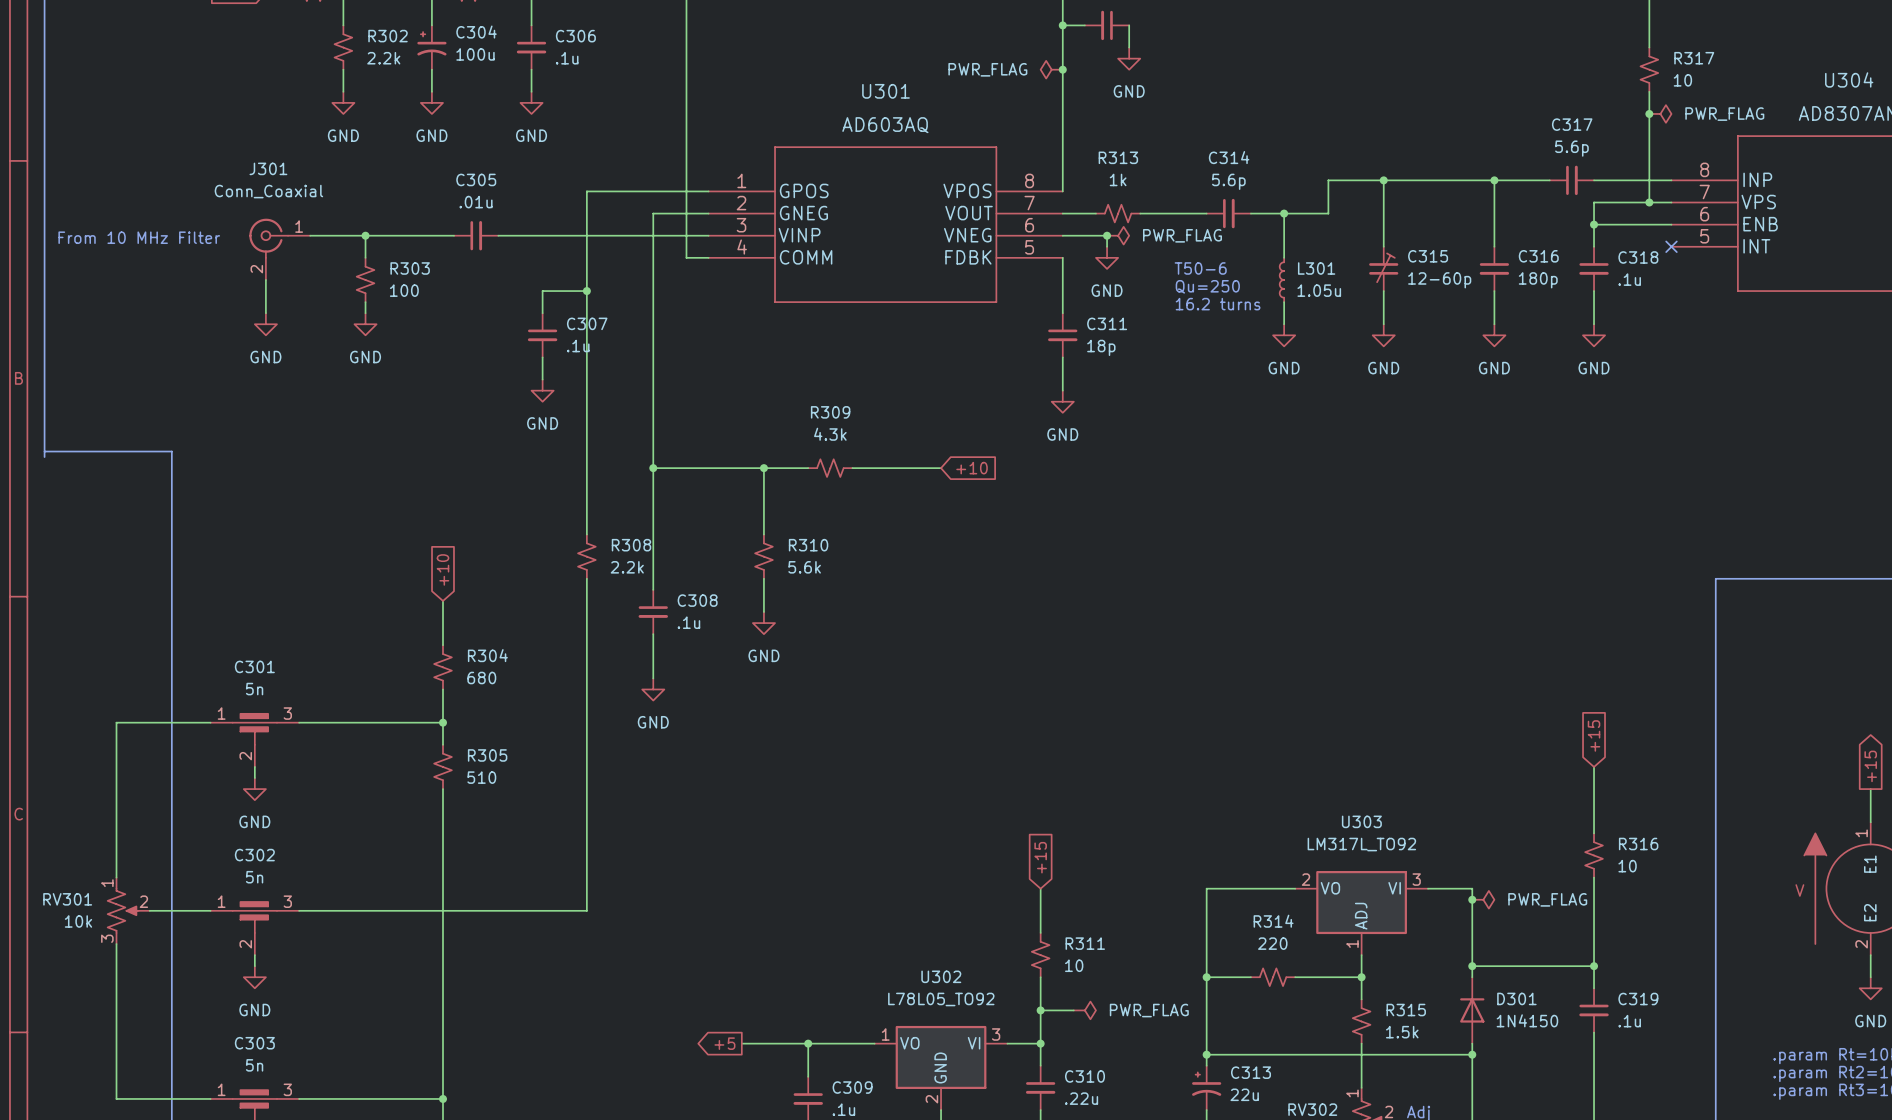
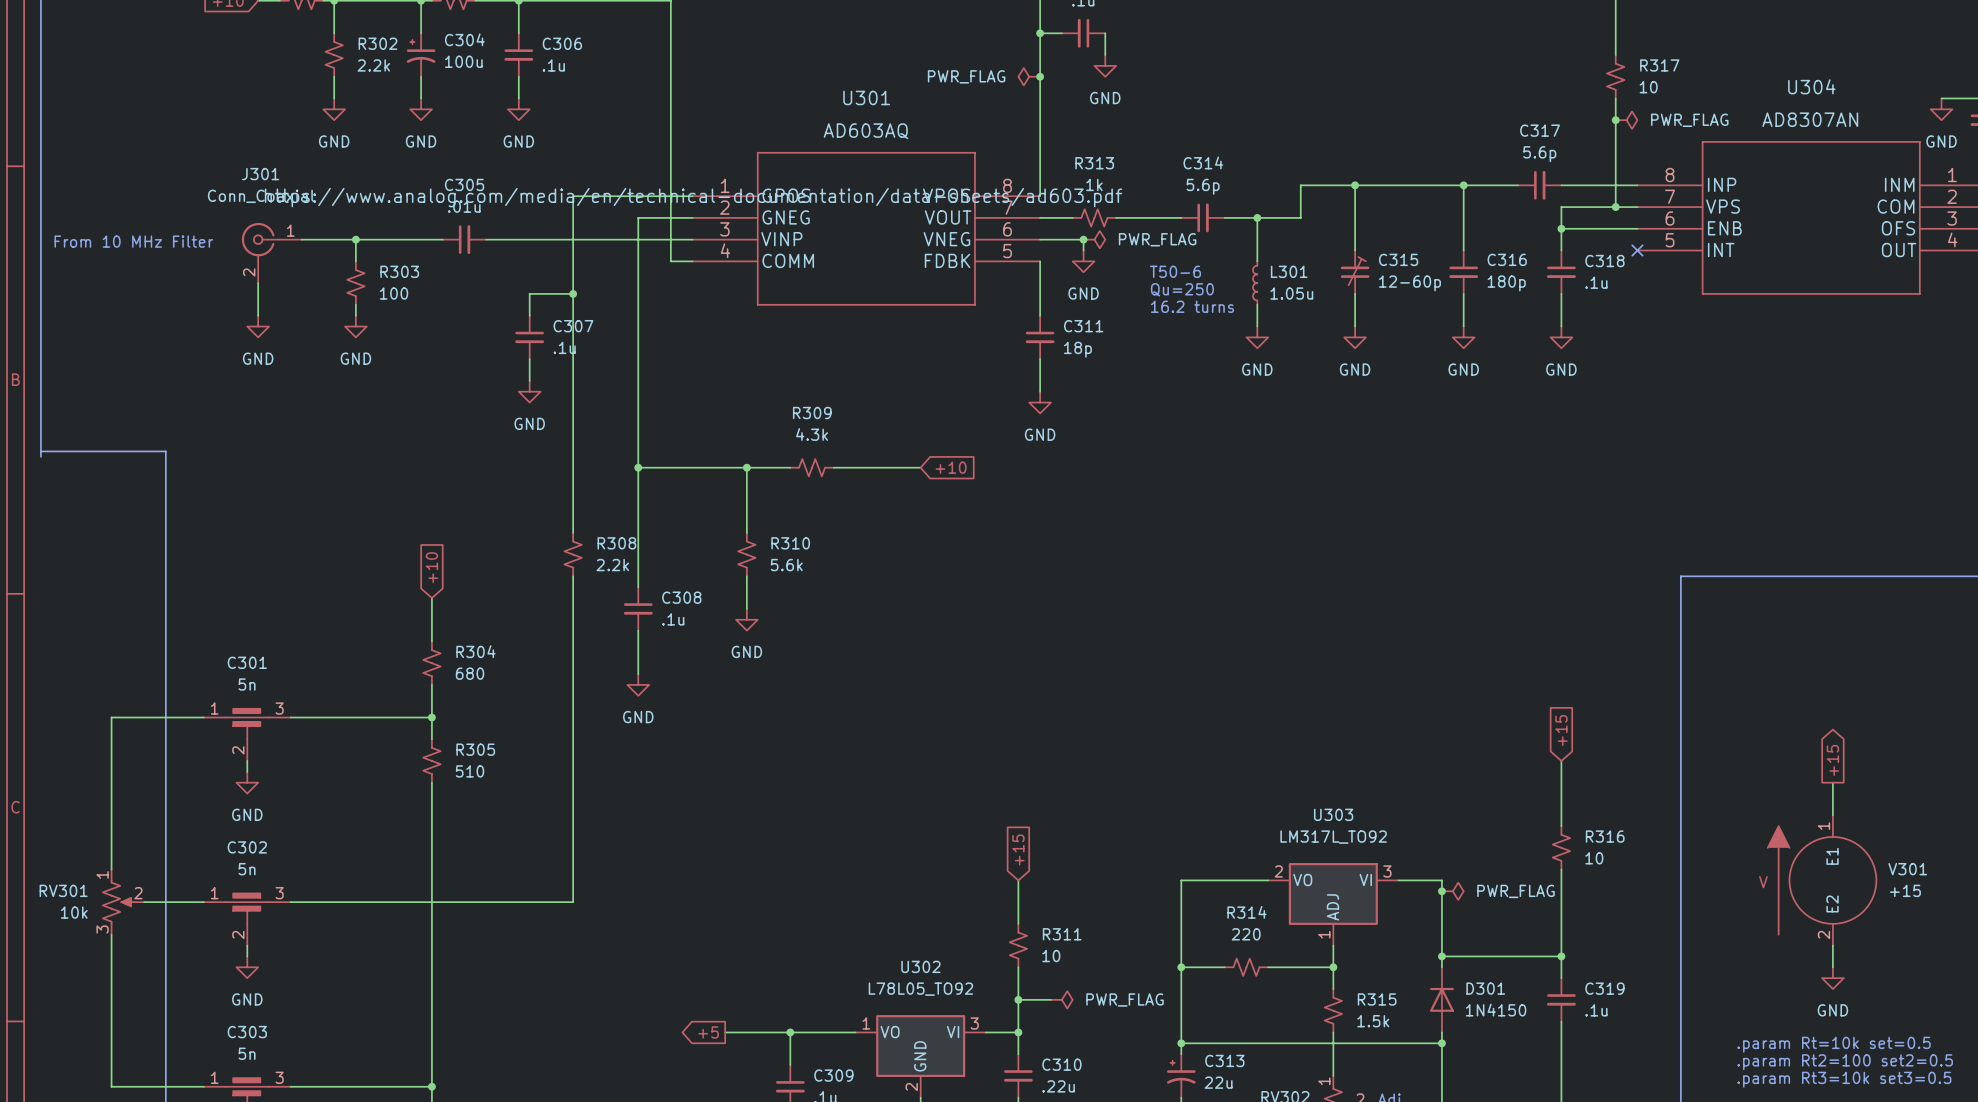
U301 text: none -> https://www.analog.com/media/en/technical-documentation/data-sheets/ad603.pdf (693, 197)

